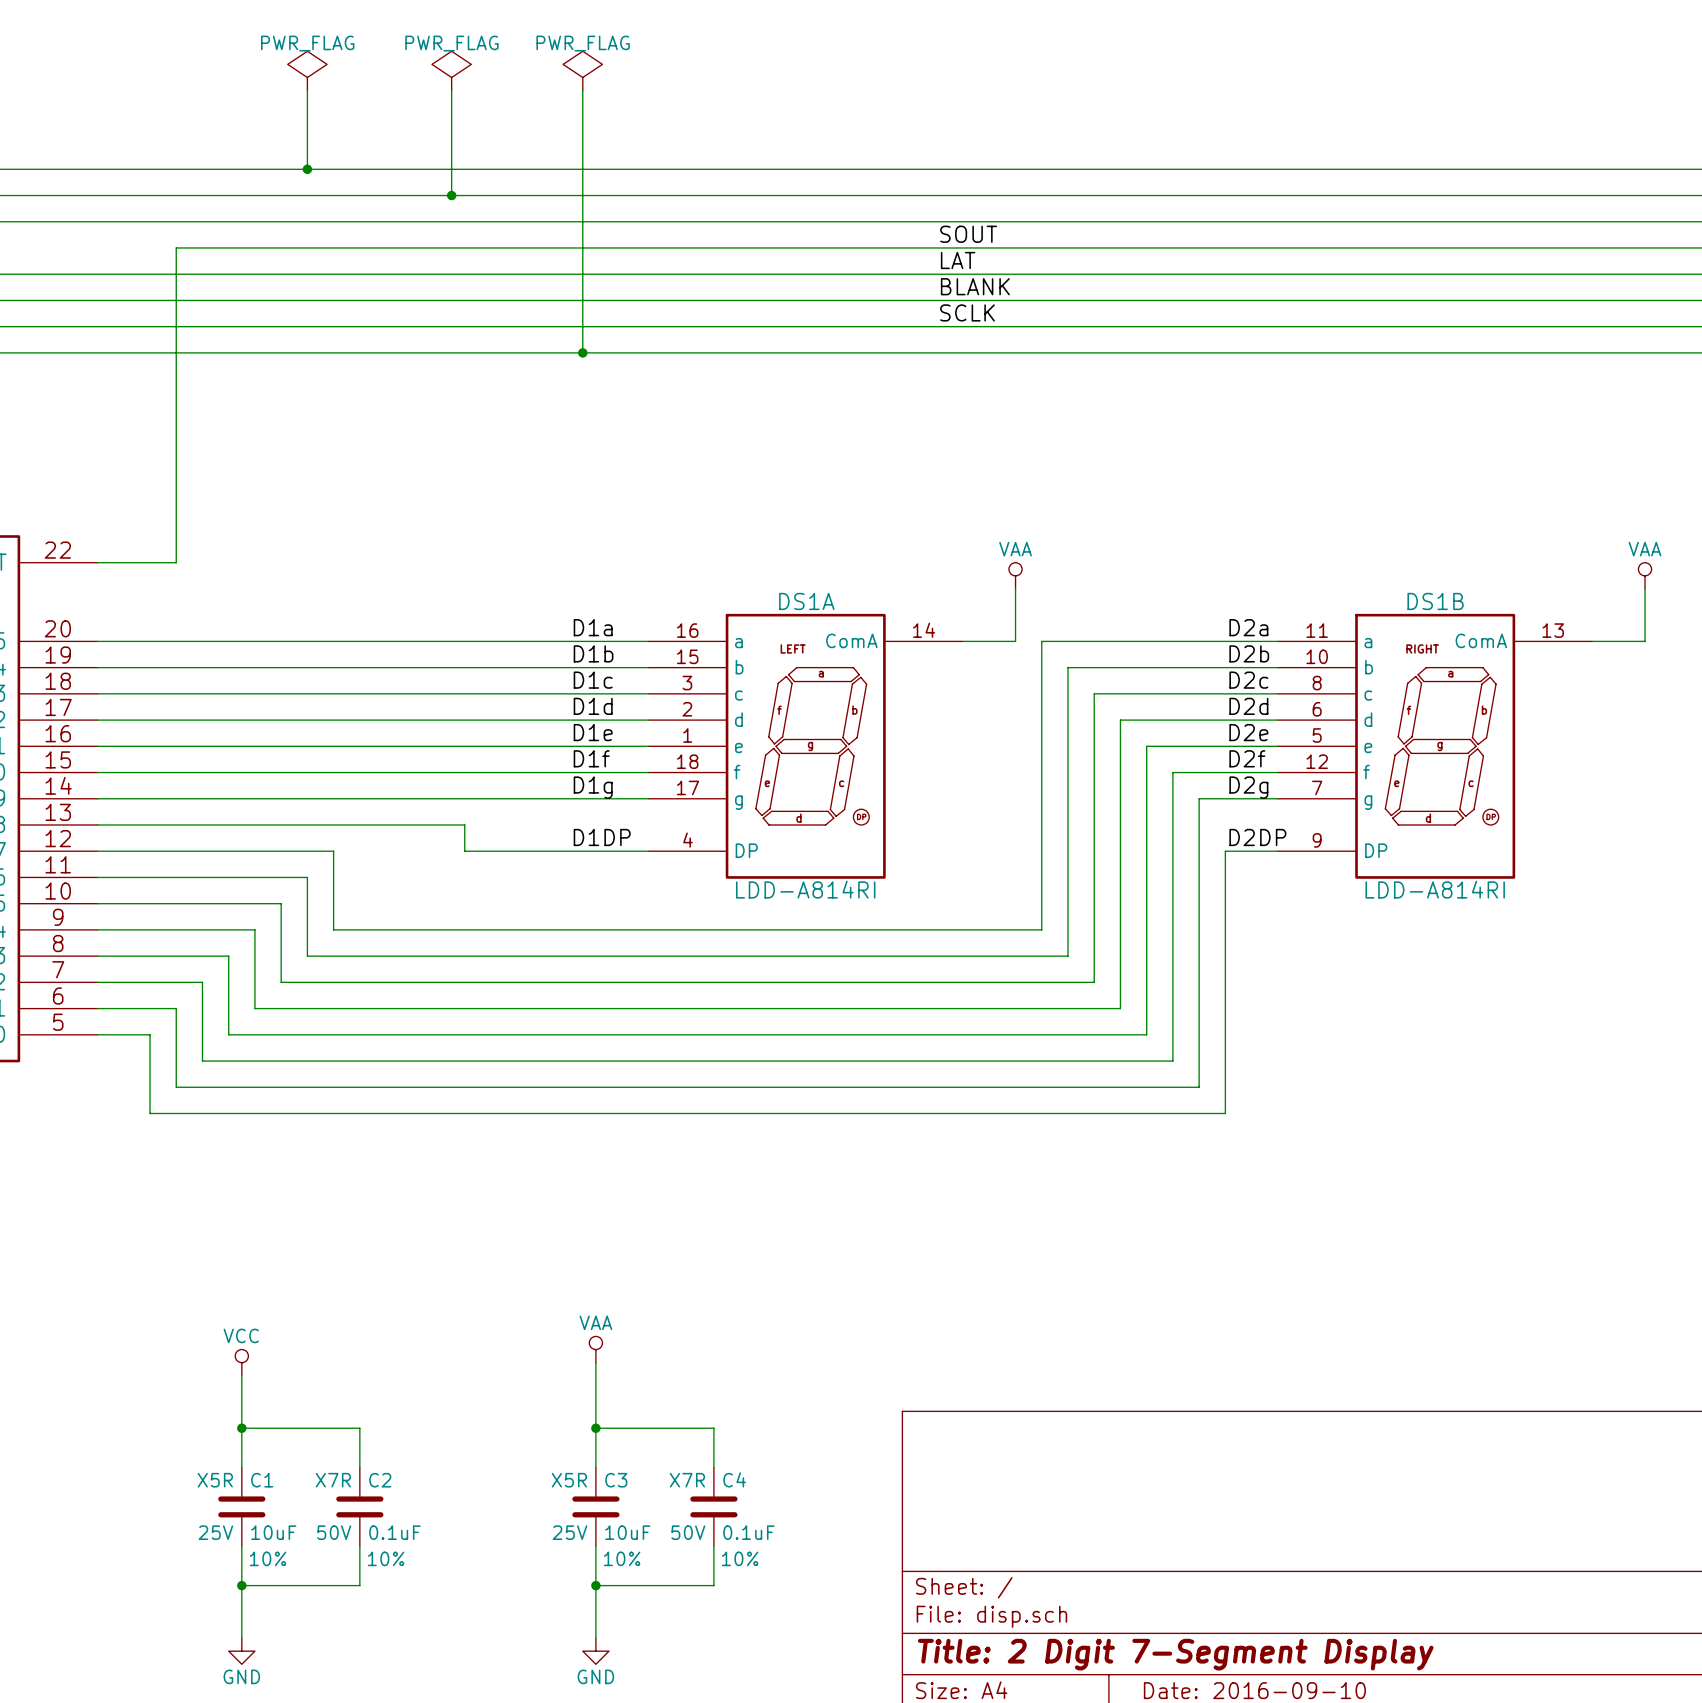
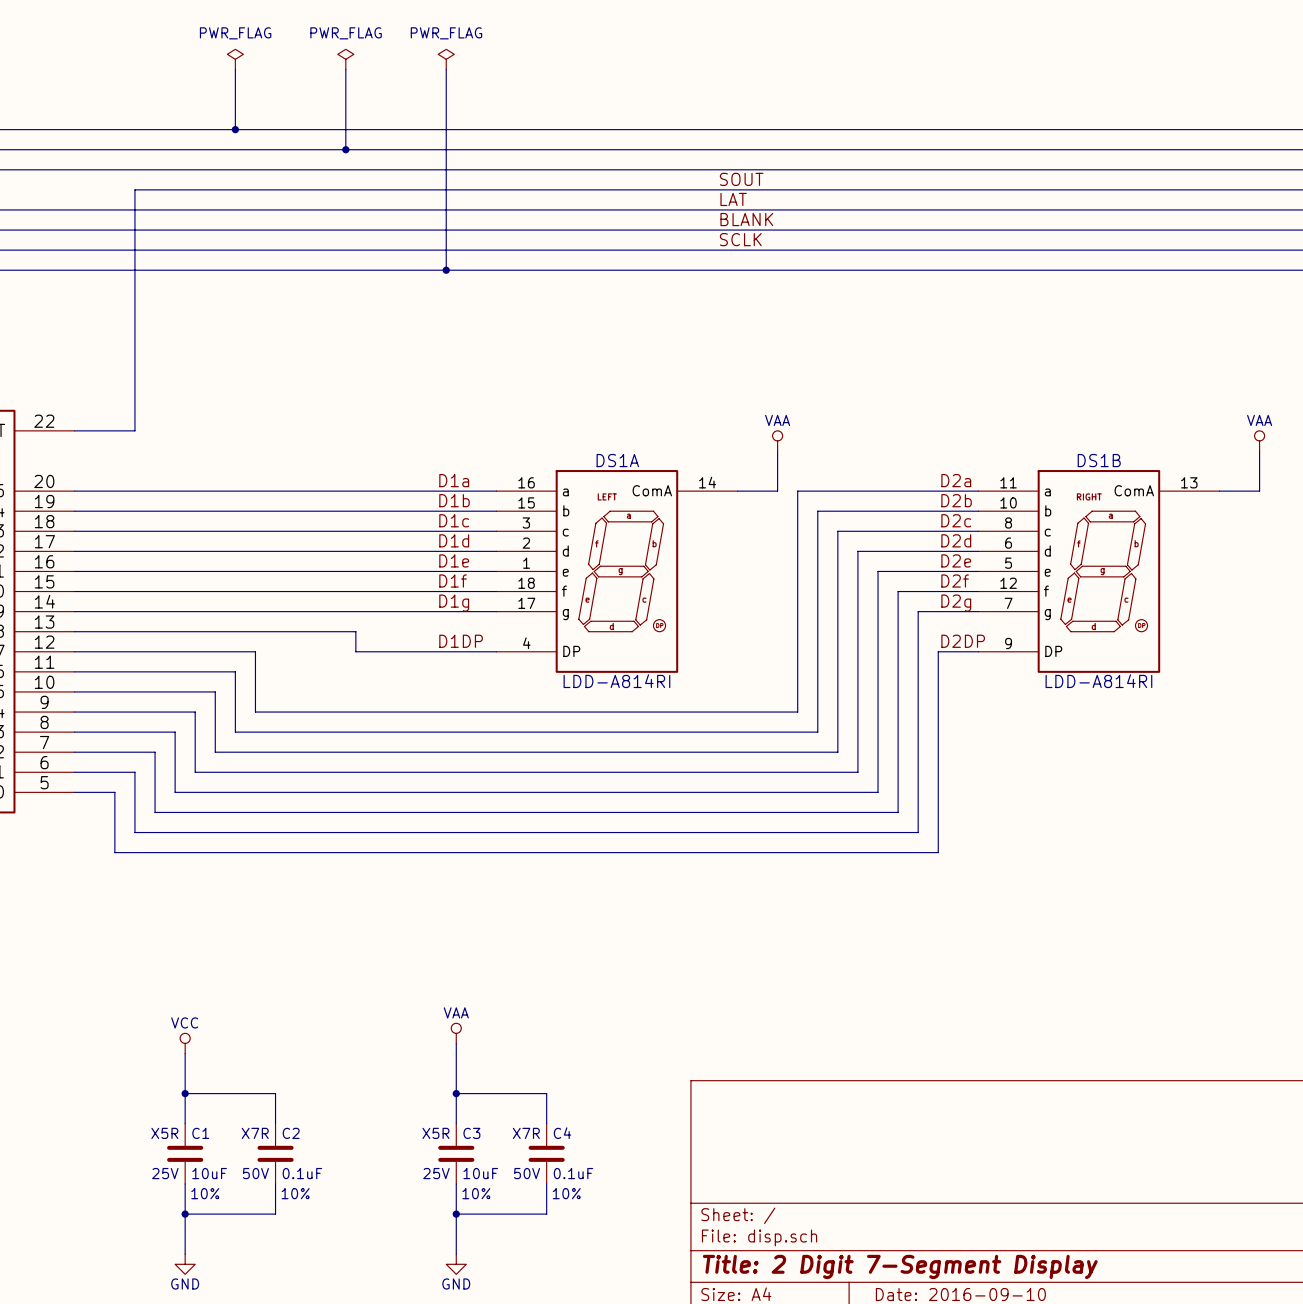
power symbol shape: [287, 51, 328, 91] -> [227, 49, 244, 70]
power symbol shape: [431, 51, 472, 91] -> [337, 49, 354, 70]
power symbol shape: [563, 51, 603, 91] -> [438, 49, 455, 70]

